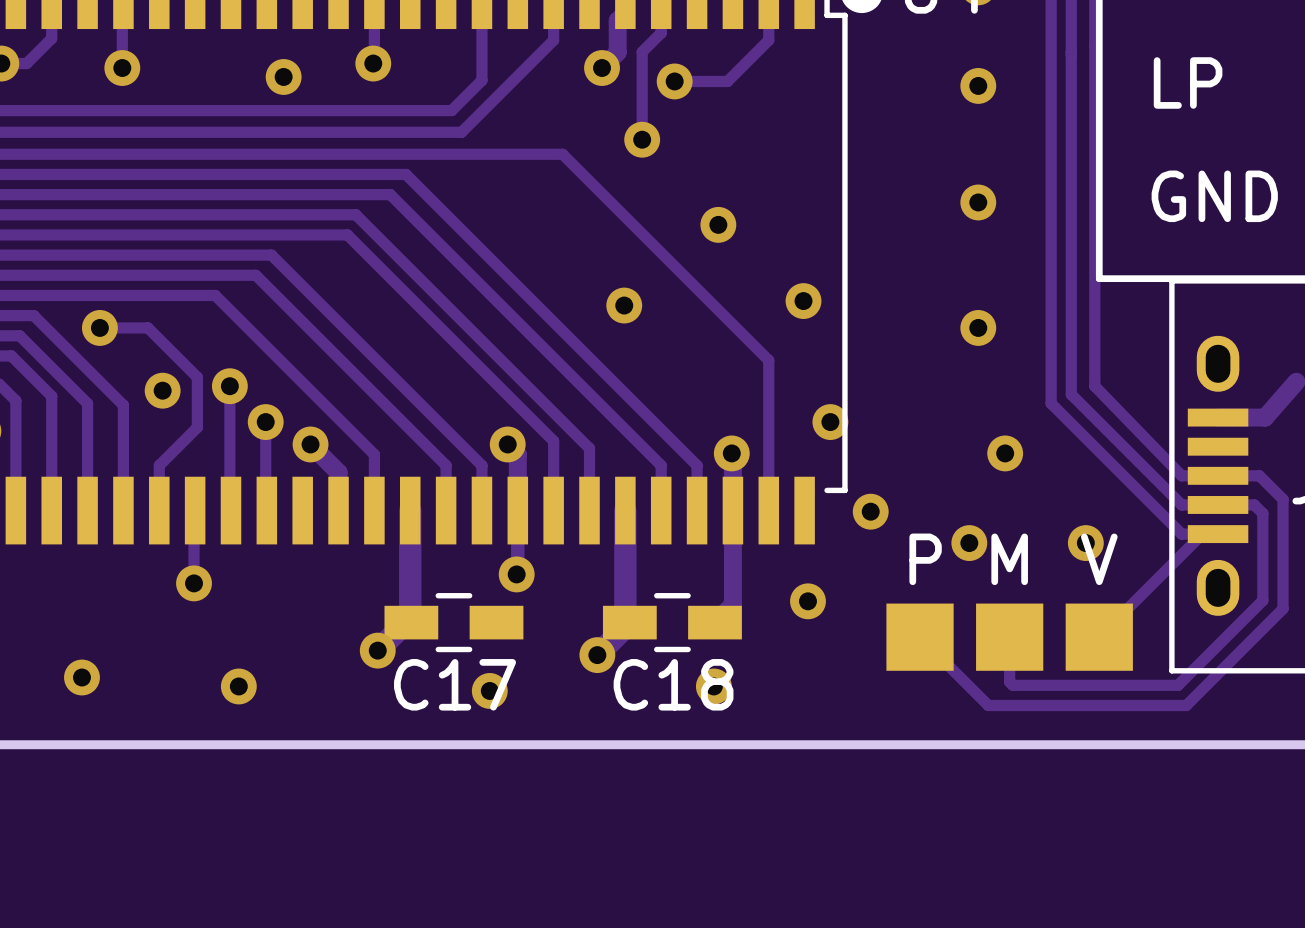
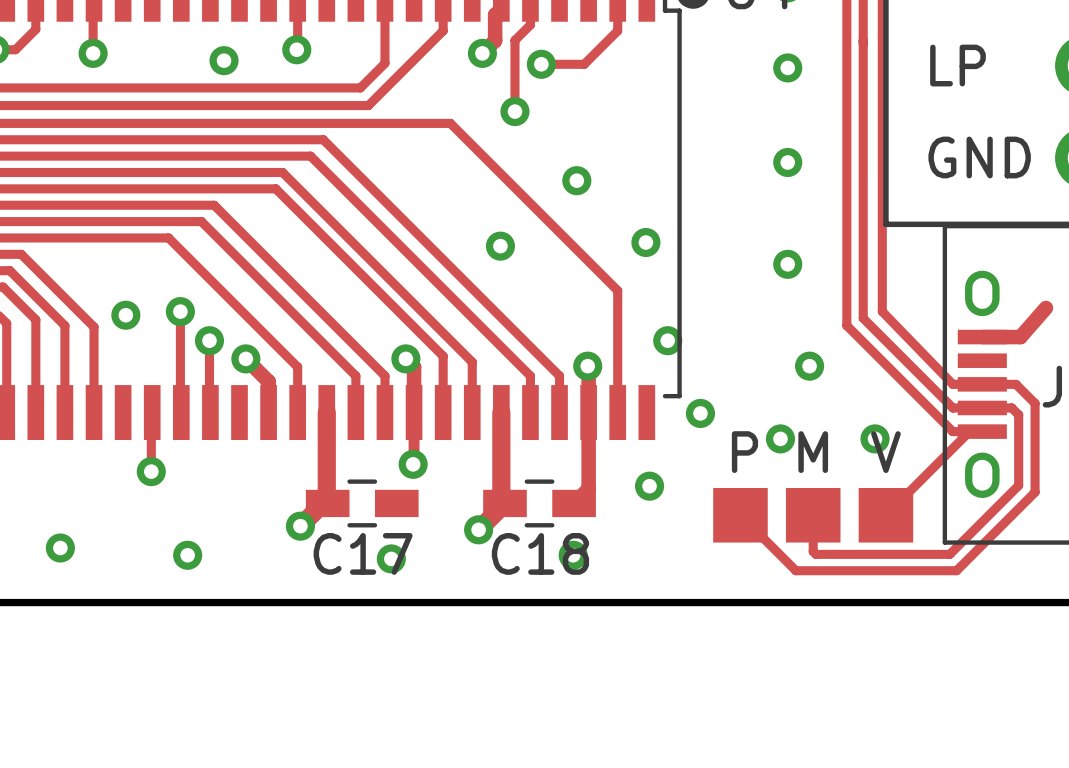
track: (99, 327) (147, 327) (197, 377) (197, 427) (159, 465) (159, 510) -> none
via: (99, 327) -> none

